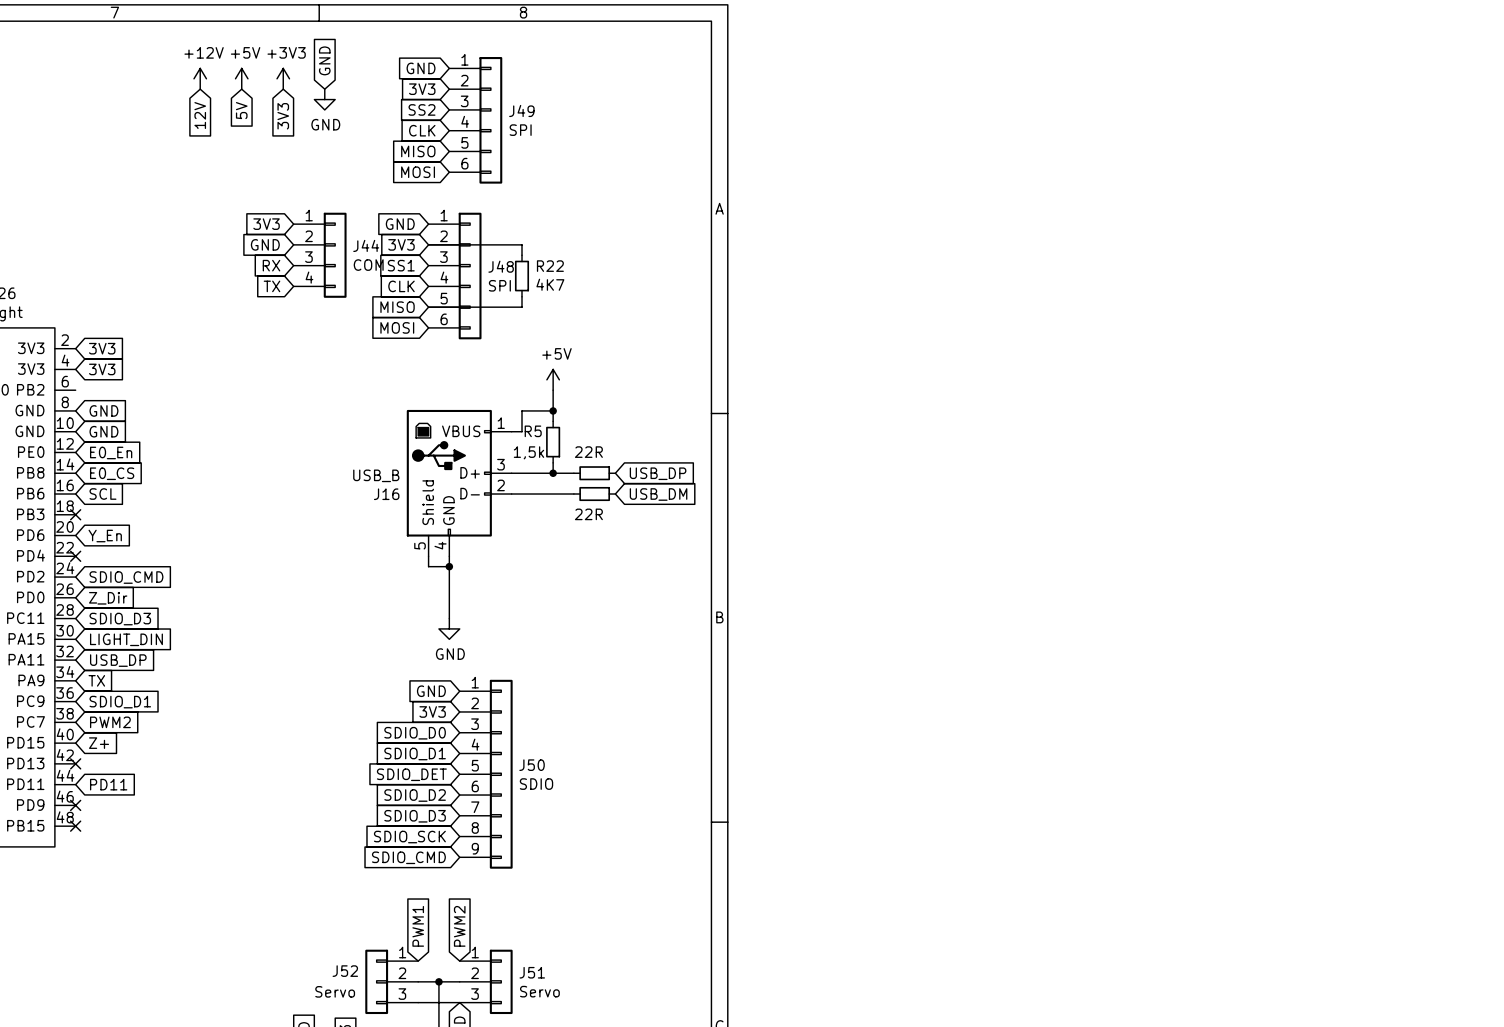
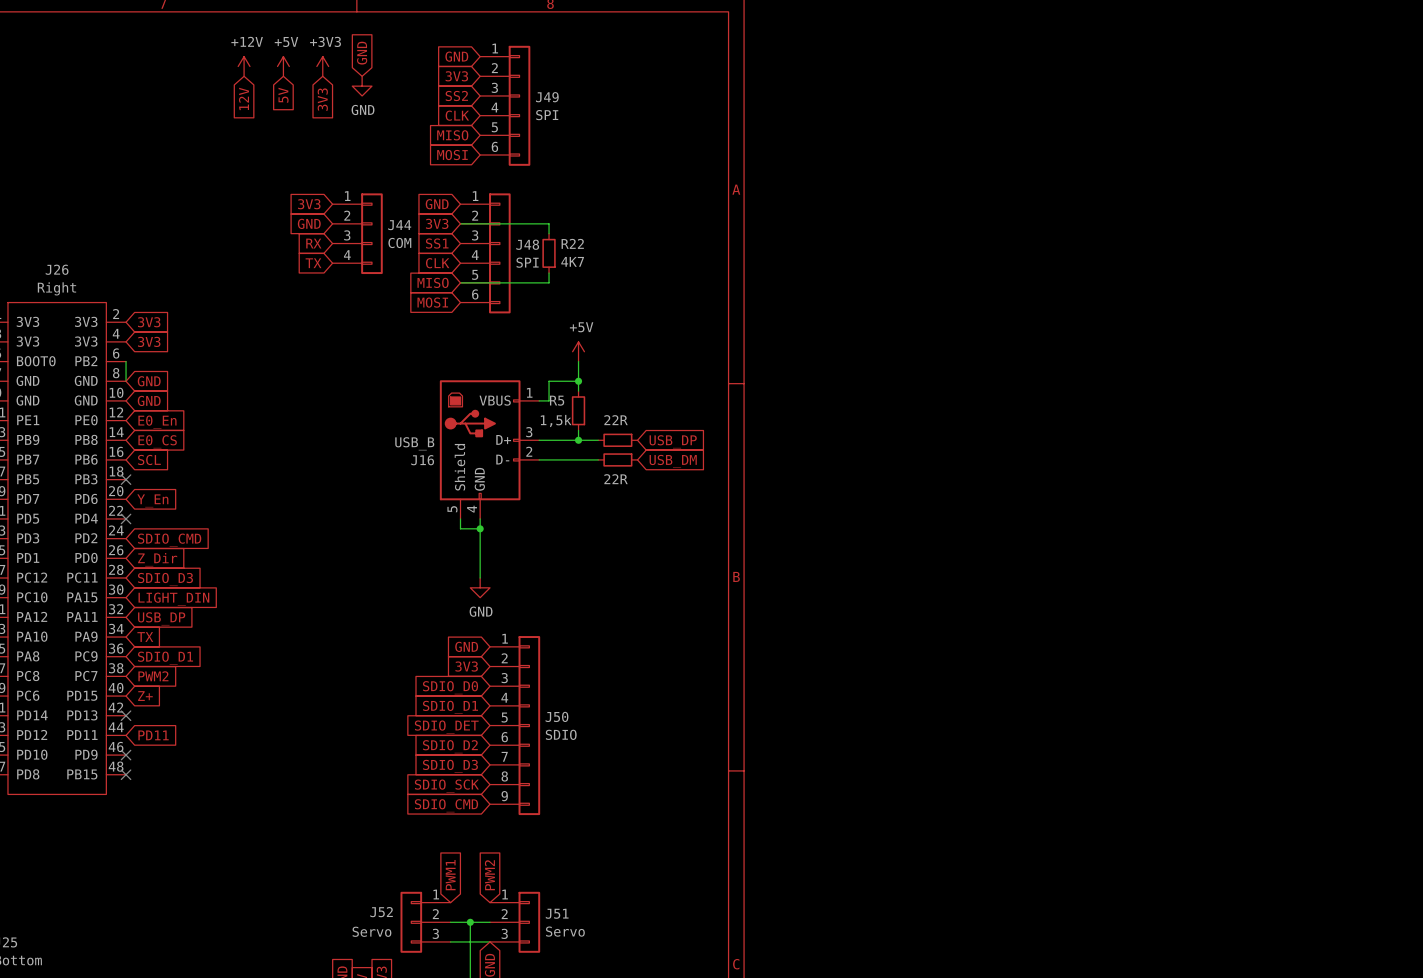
wire: none -> (126, 361) (126, 381)

